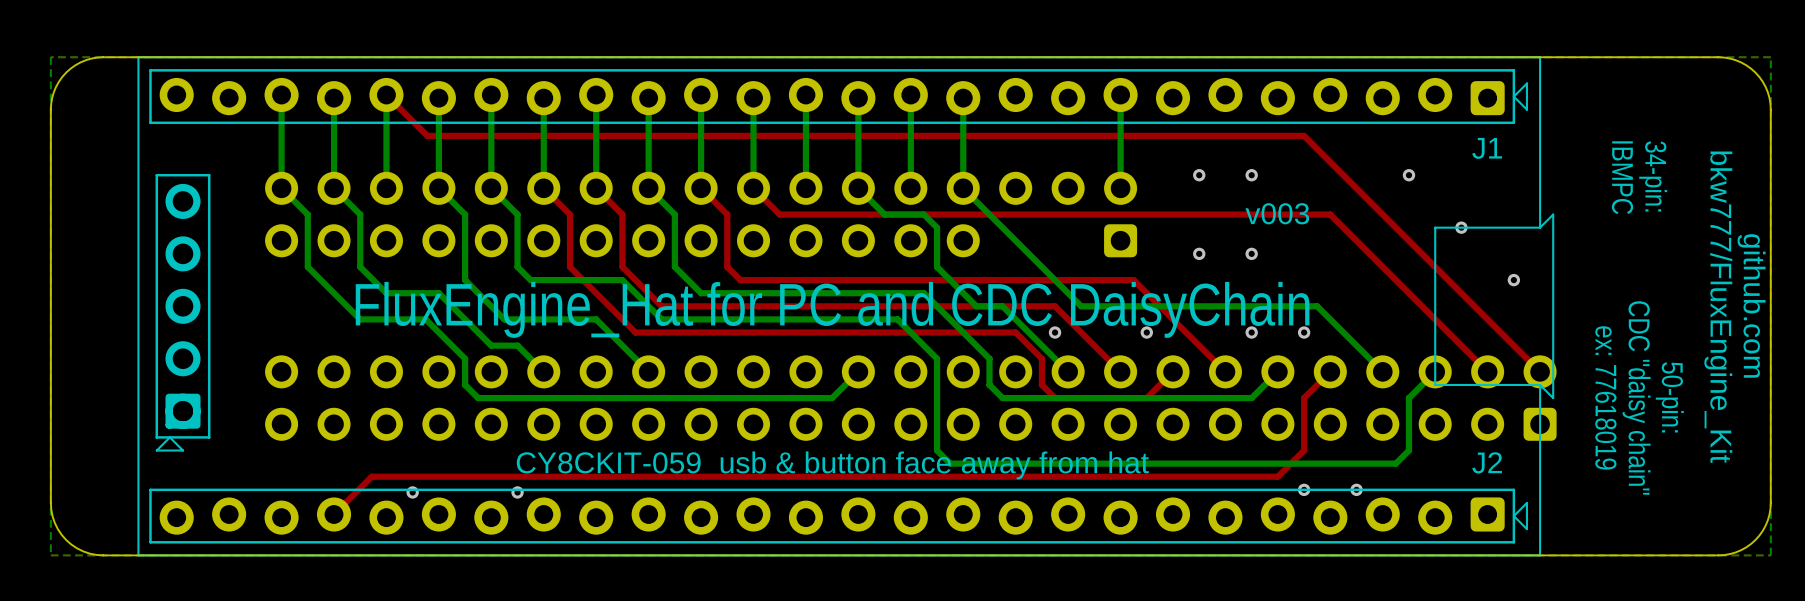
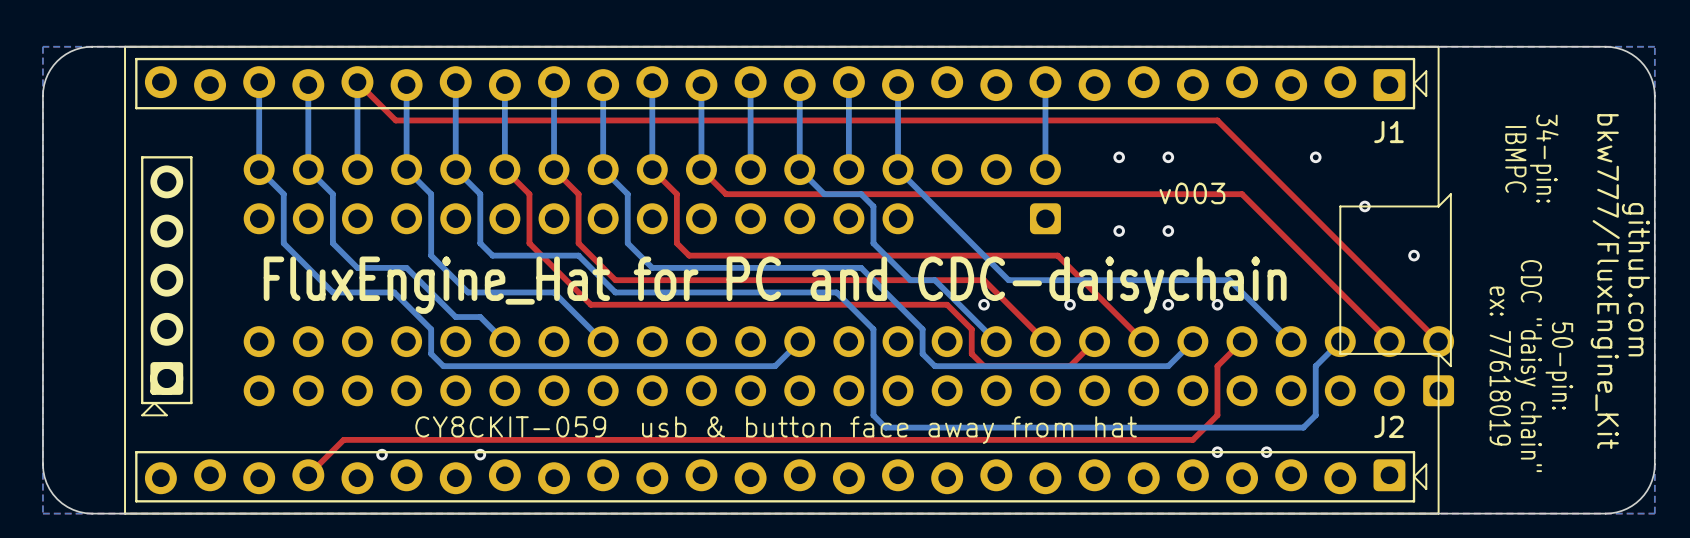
text: FluxEngine_Hat for PC and CDC DaisyChain (832, 309) -> FluxEngine_Hat for PC and CDC-daisychain (775, 285)

